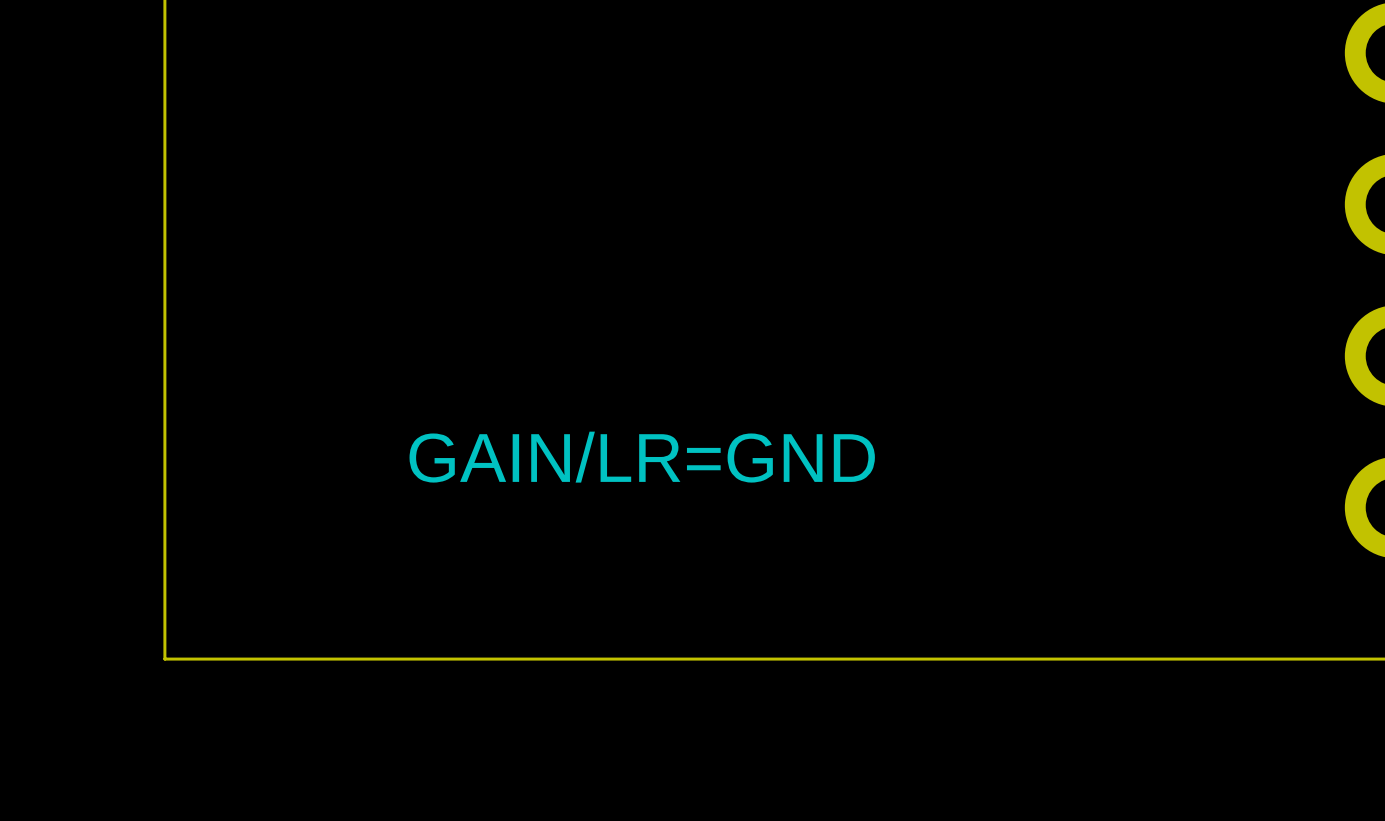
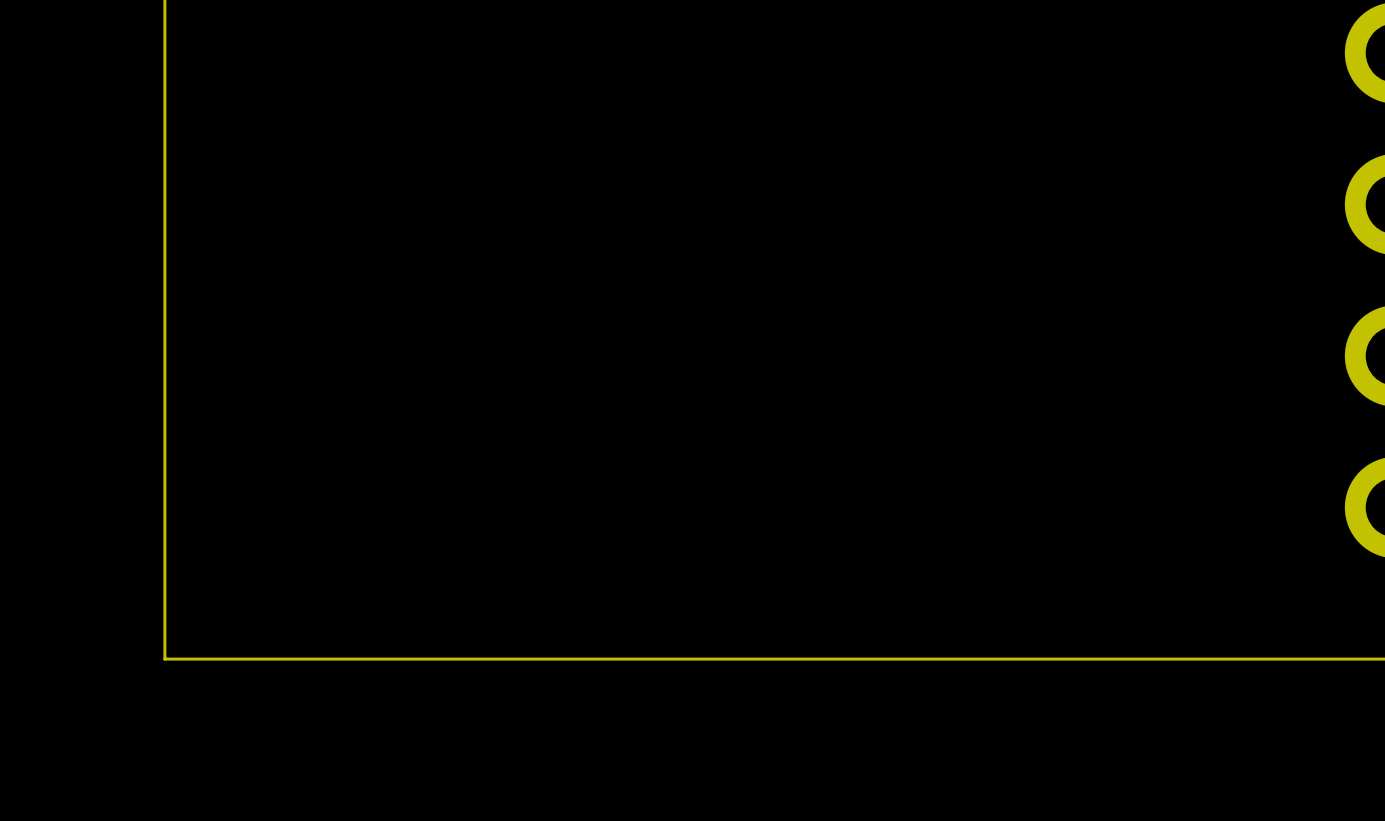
text: GAIN/LR=GND (642, 457) -> none

